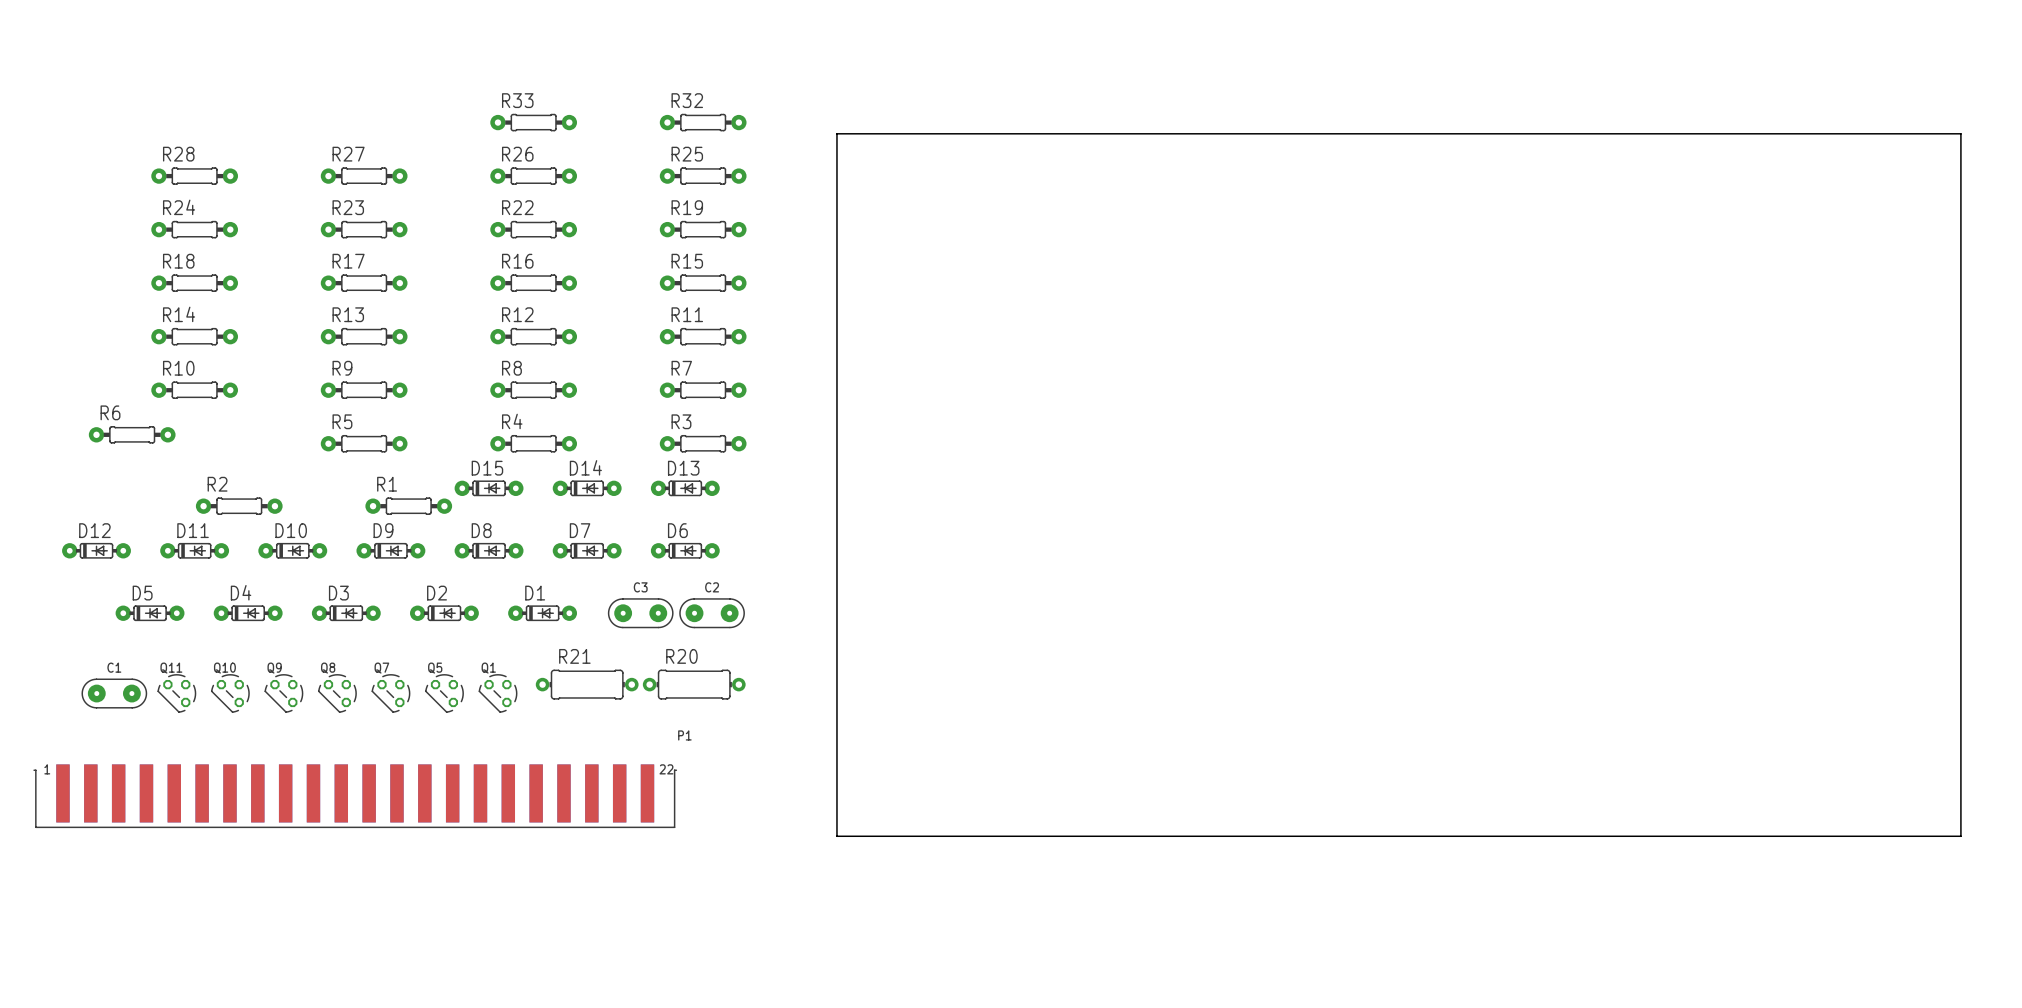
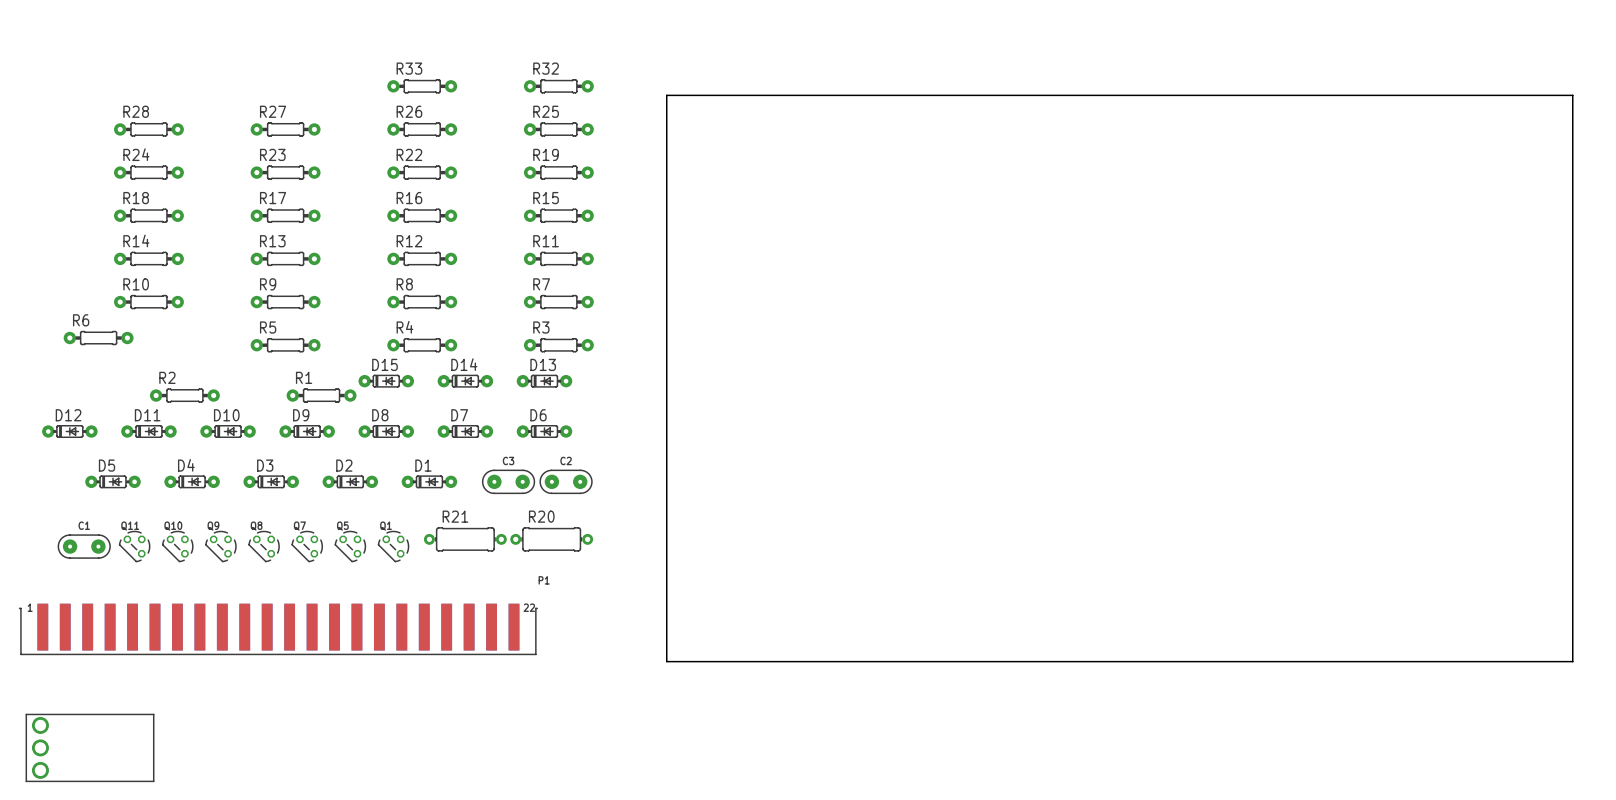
part: none -> (90, 747)

